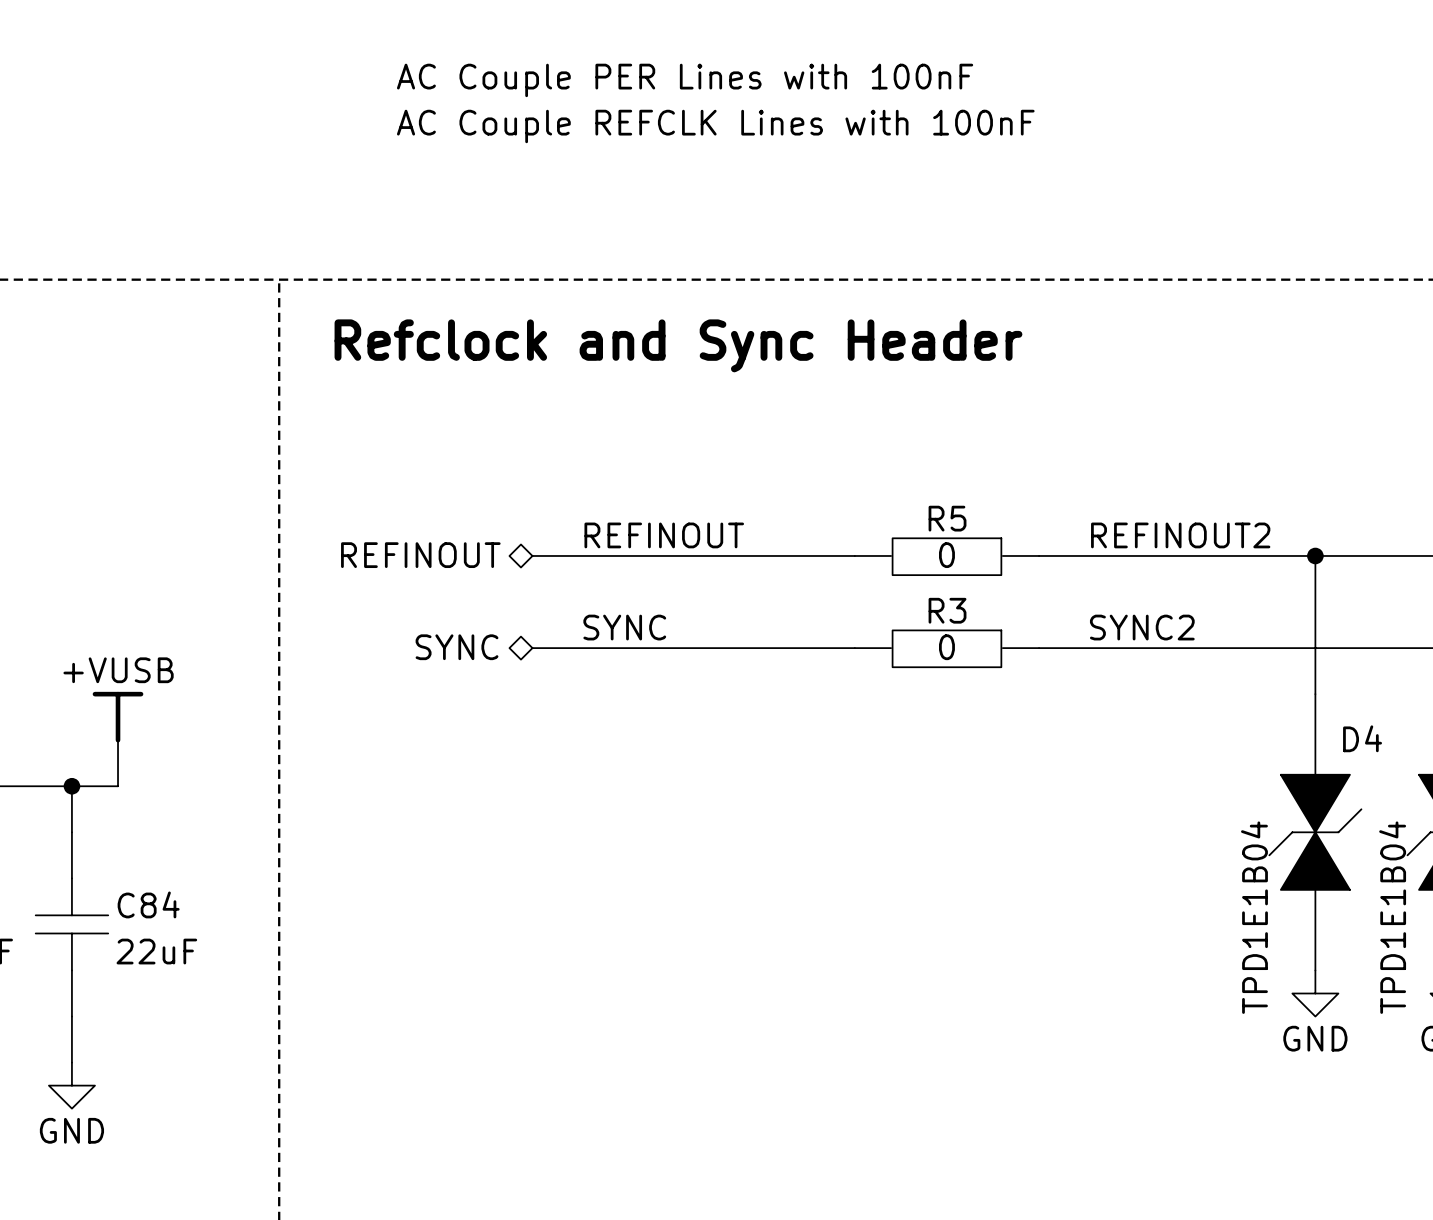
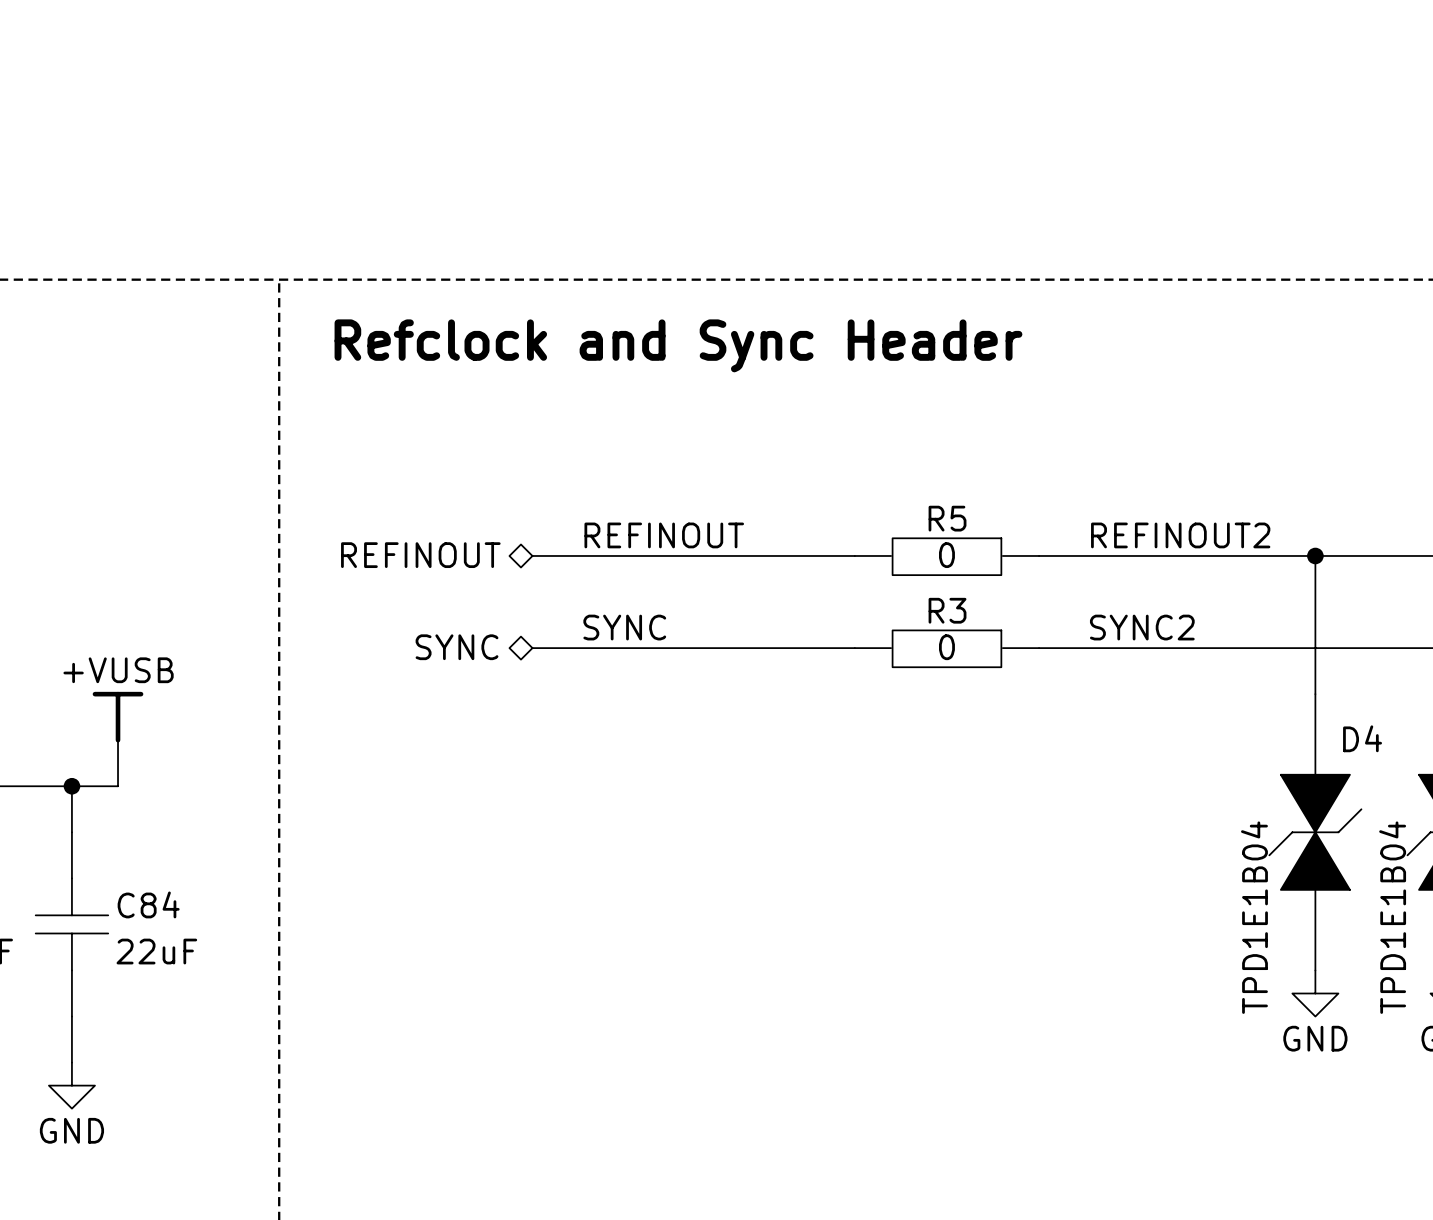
text: AC Couple PER Lines with 100nF (685, 80) -> none
text: AC Couple REFCLK Lines with 100nF (715, 126) -> none

